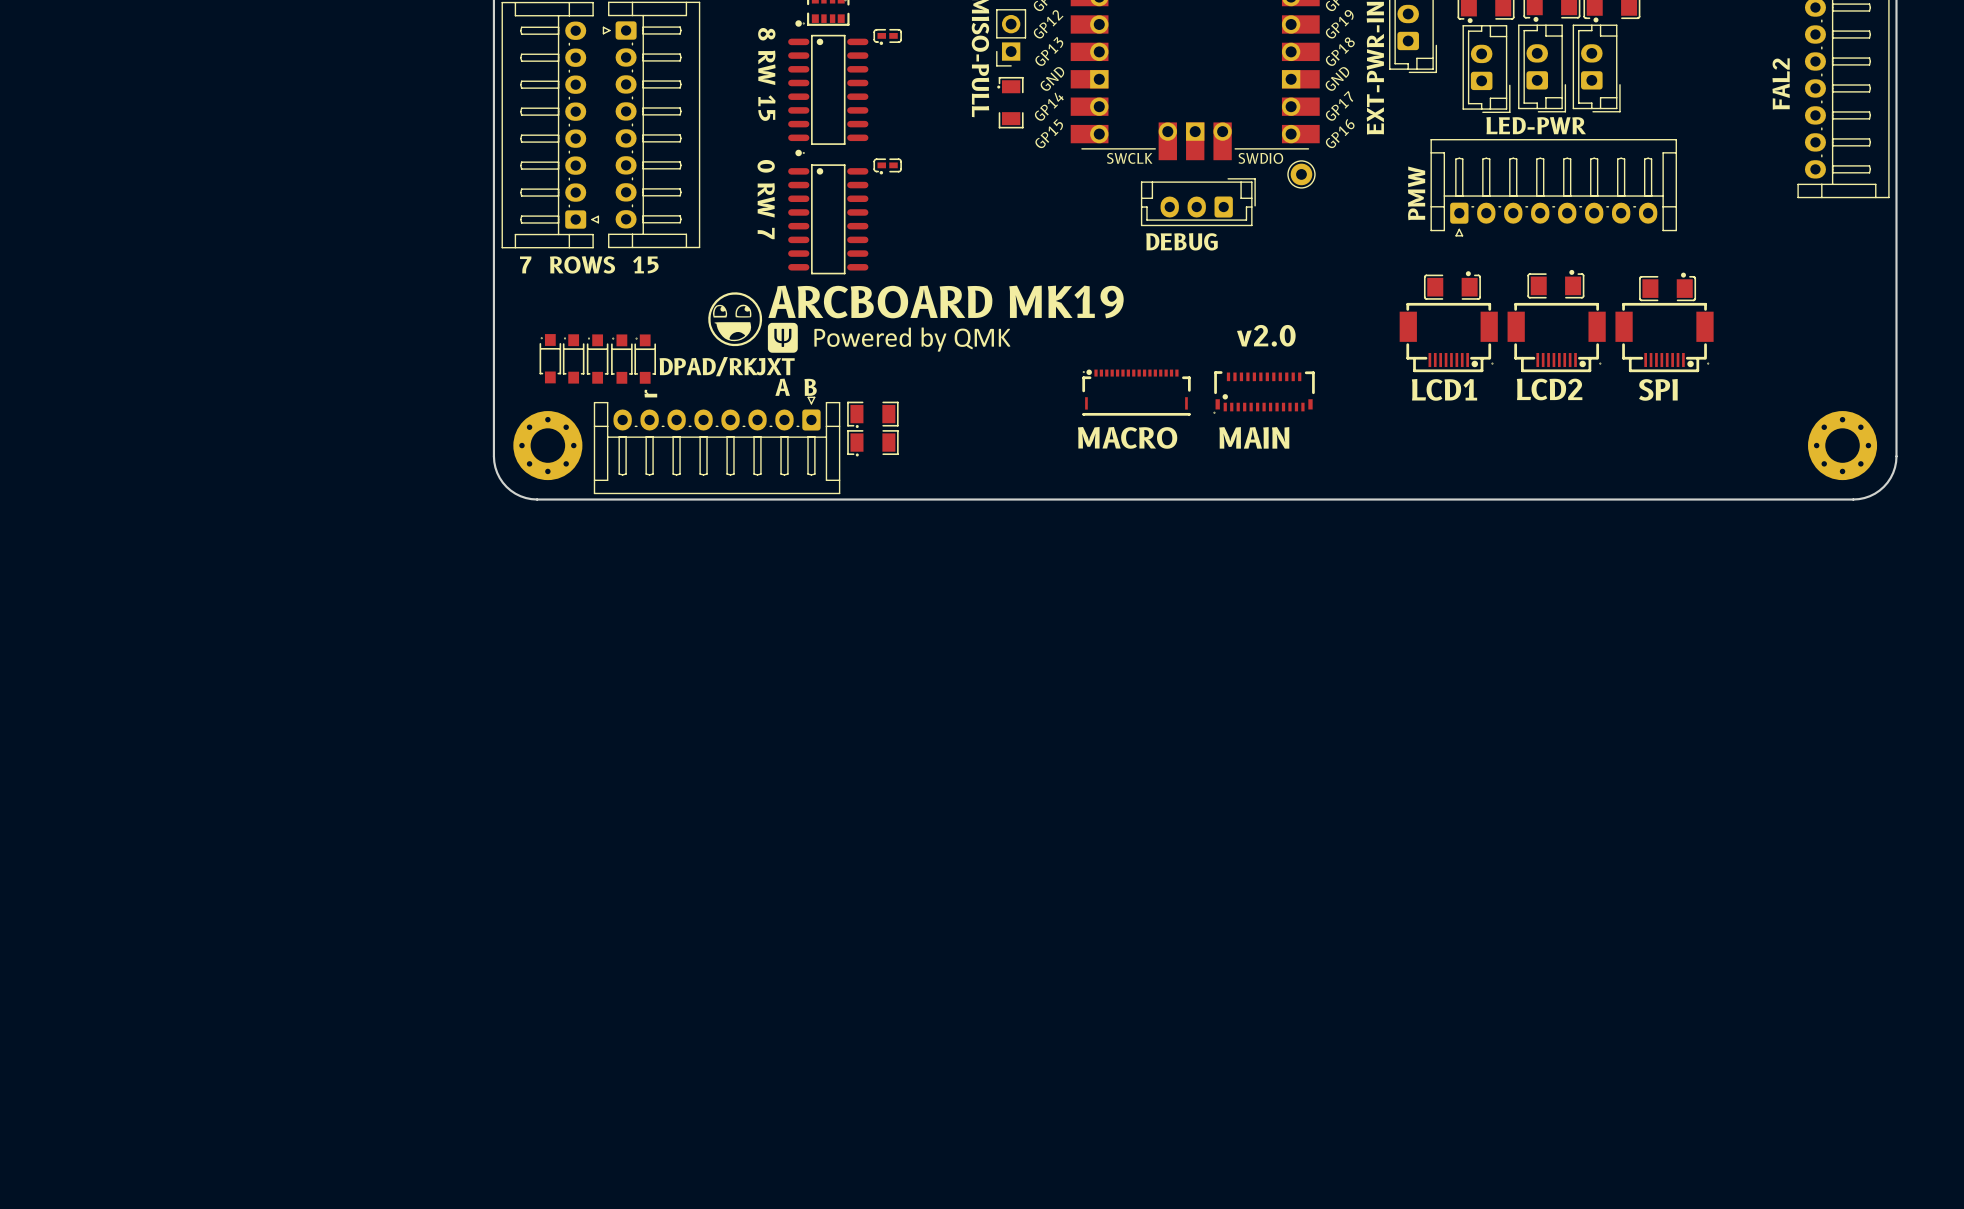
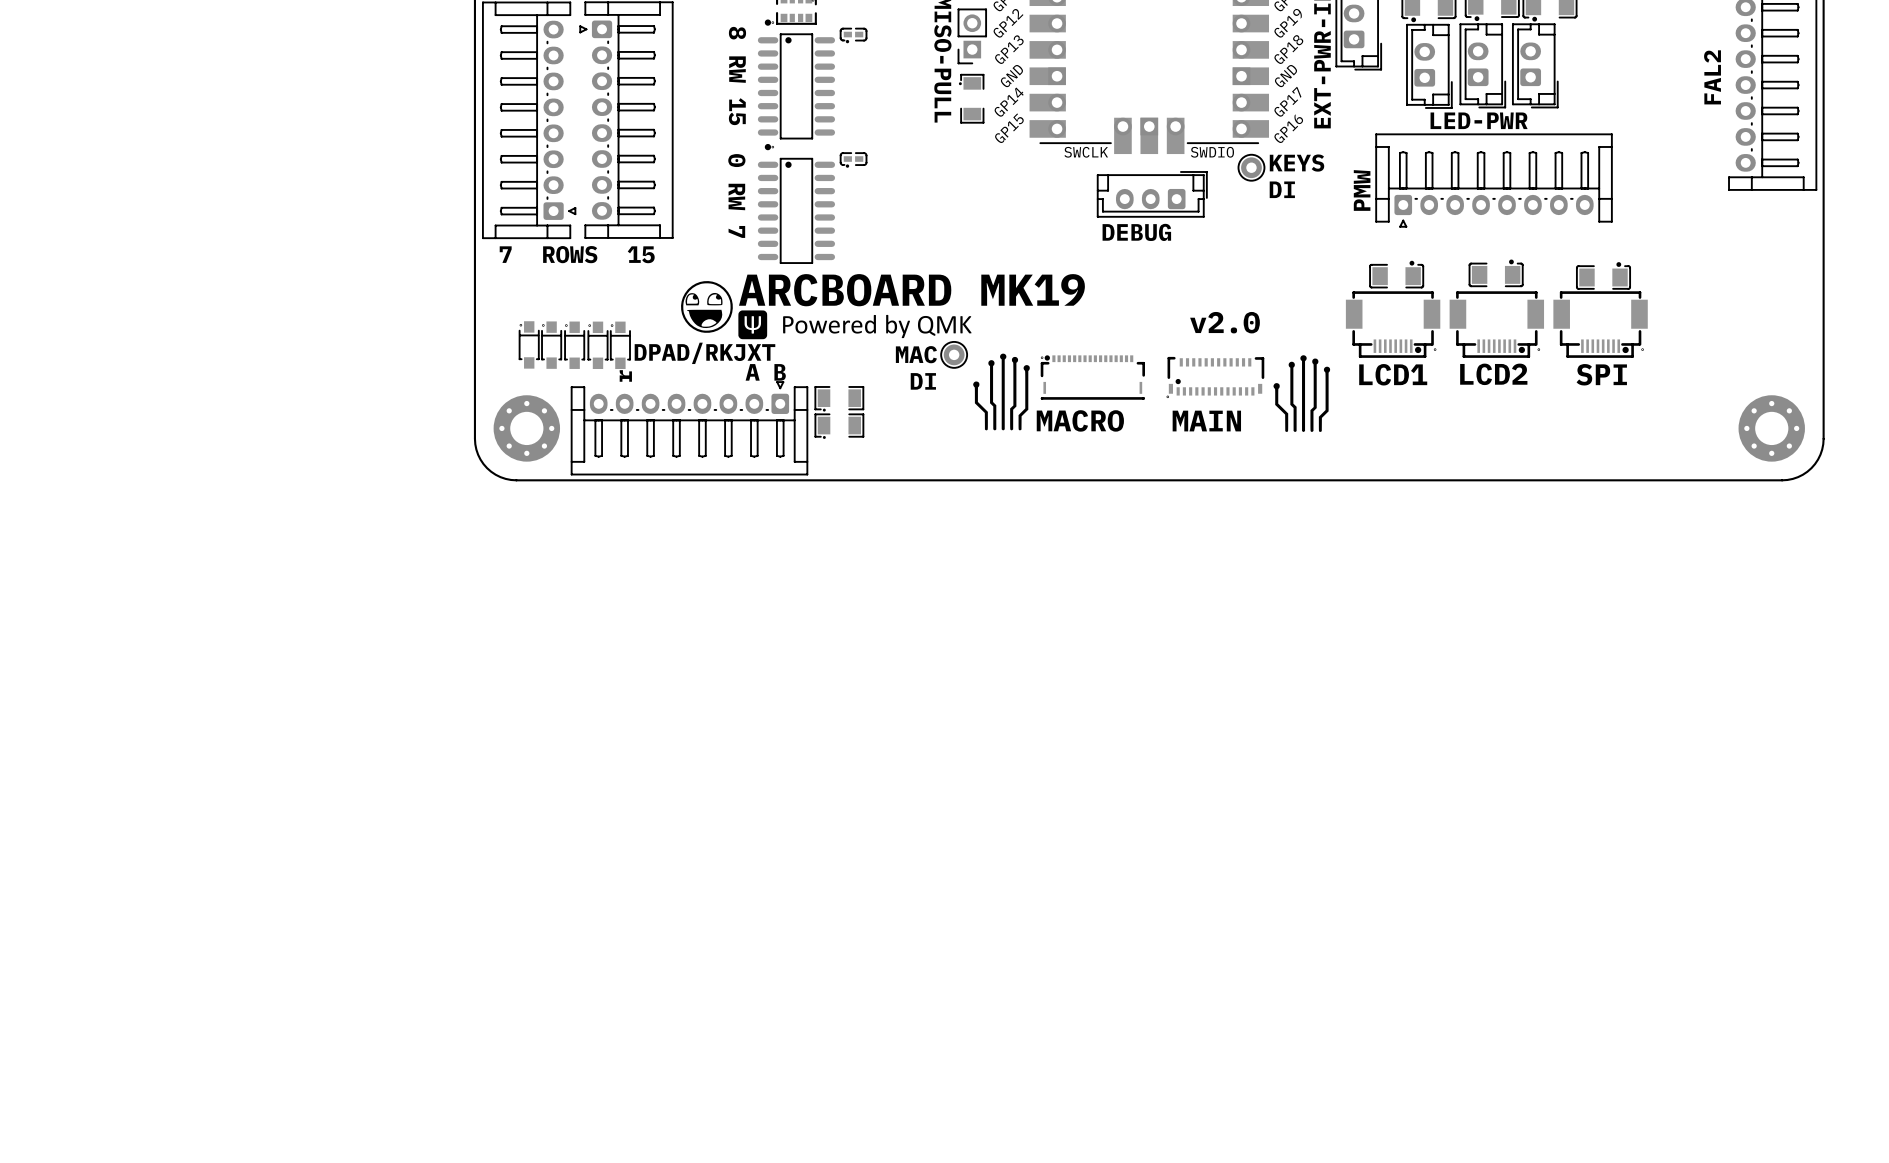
text: none -> KEYS (1297, 163)
text: none -> DI (1282, 189)
drawing: none -> [973, 353, 1030, 431]
text: none -> MAC (916, 354)
part: none -> (954, 354)
drawing: none -> [1273, 355, 1331, 432]
text: none -> DI (923, 381)

